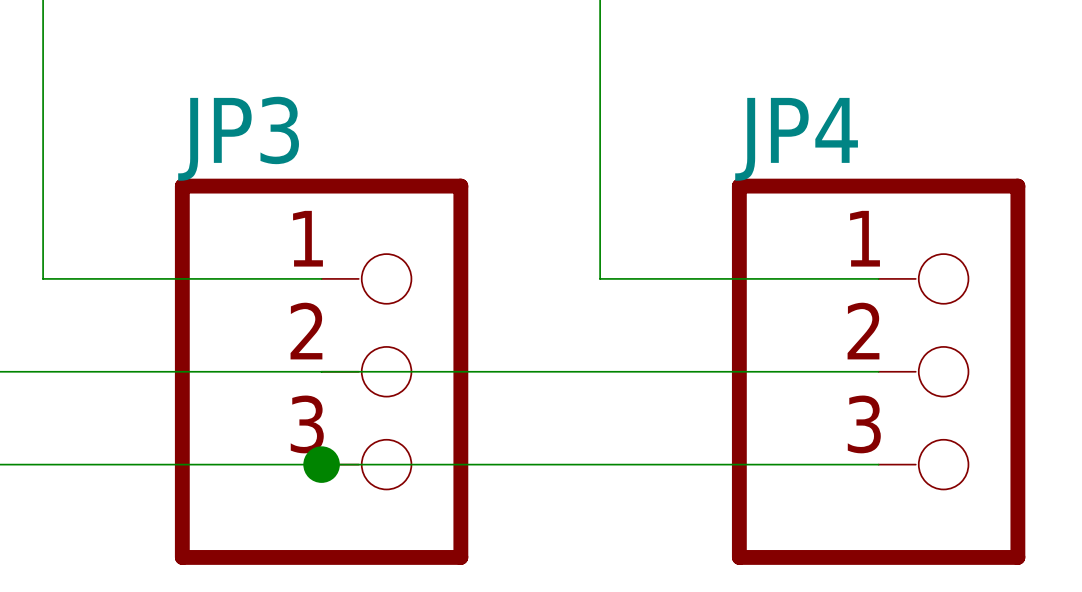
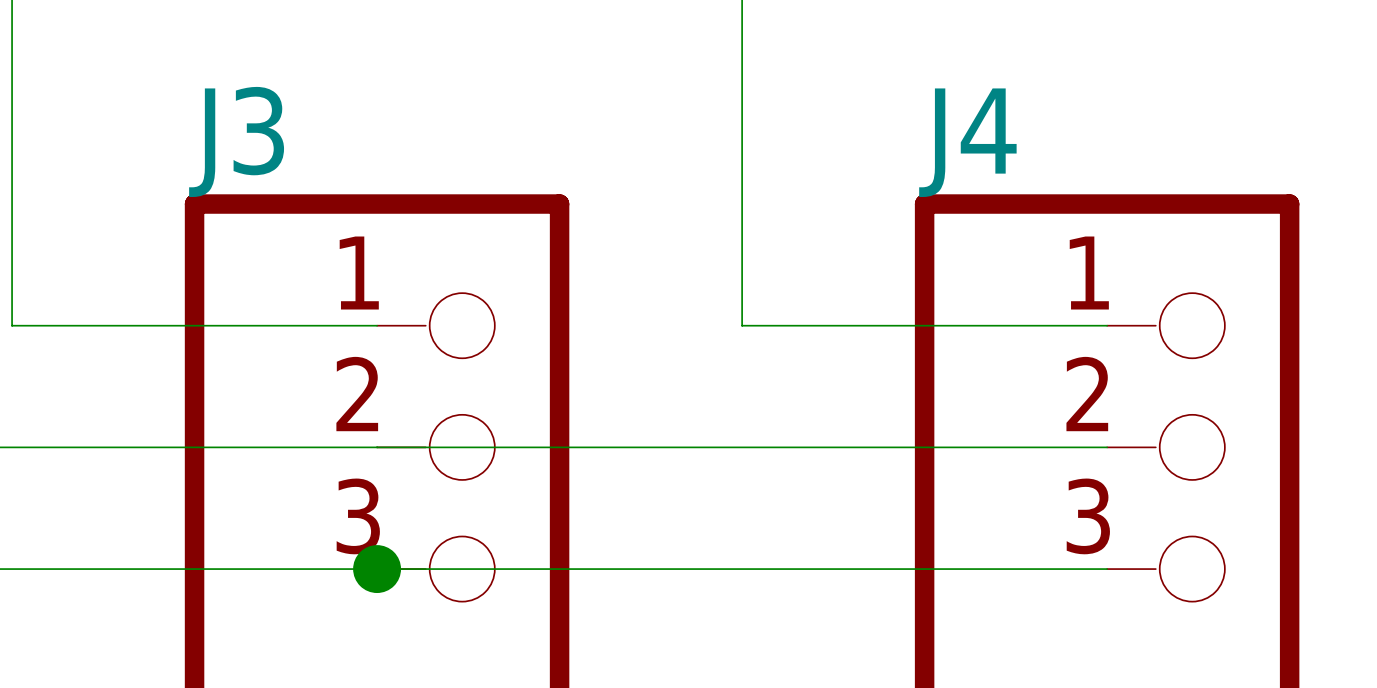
JP3 name: JP3 (238, 138) -> J3 (236, 141)
JP4 name: JP4 (796, 139) -> J4 (967, 142)

